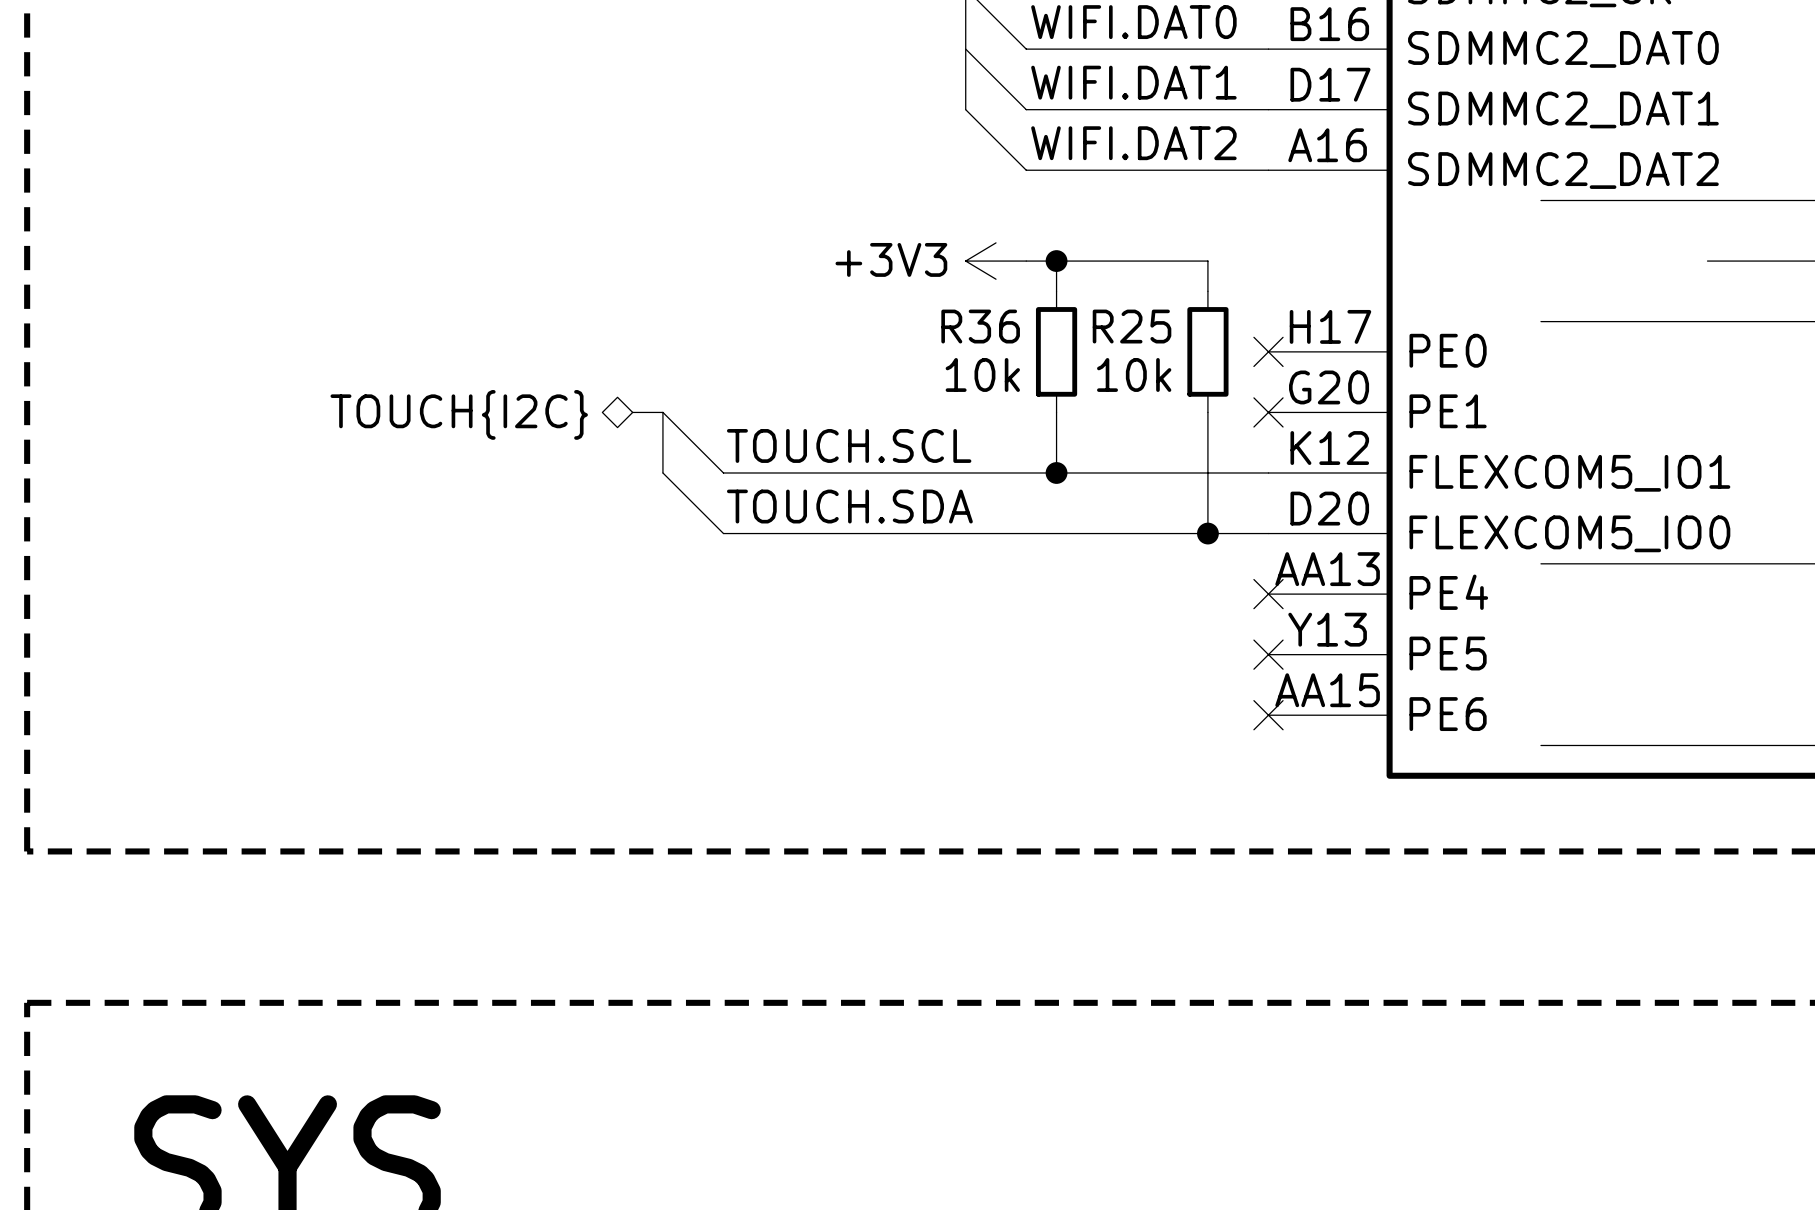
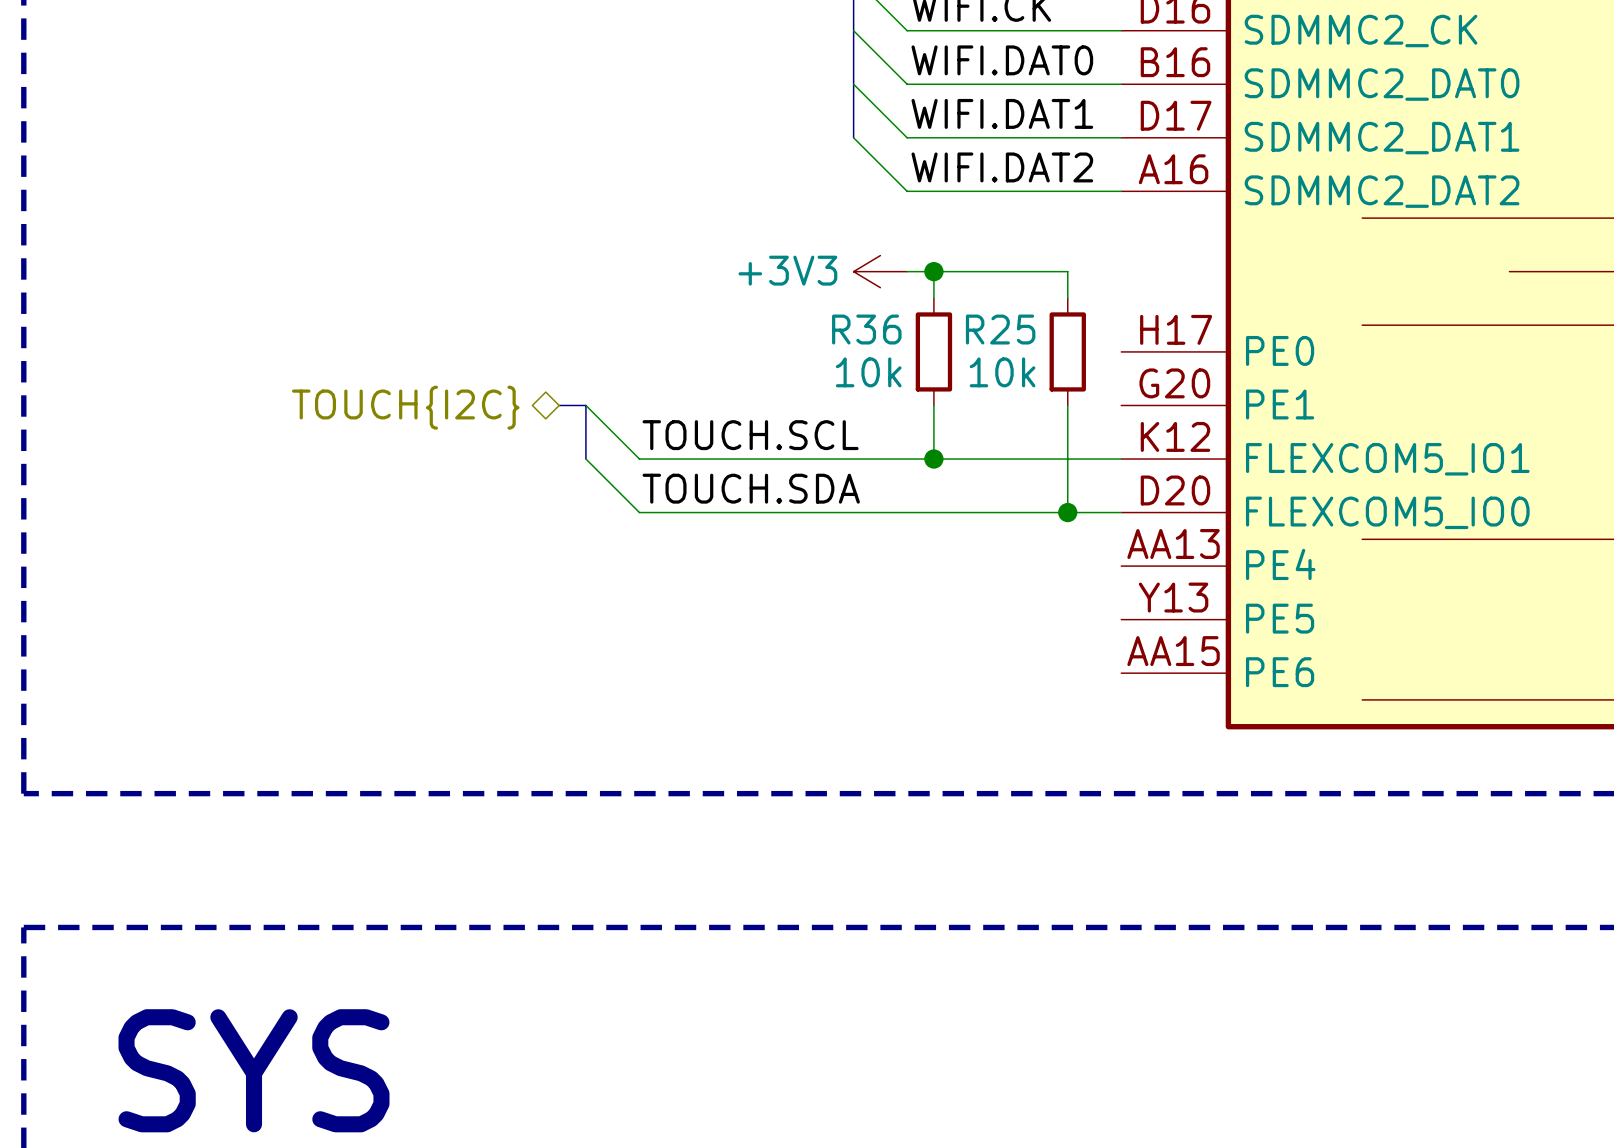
no-connect mark: (1268, 351) -> none
no-connect mark: (1268, 412) -> none
no-connect mark: (1268, 594) -> none
no-connect mark: (1268, 654) -> none
no-connect mark: (1268, 715) -> none

